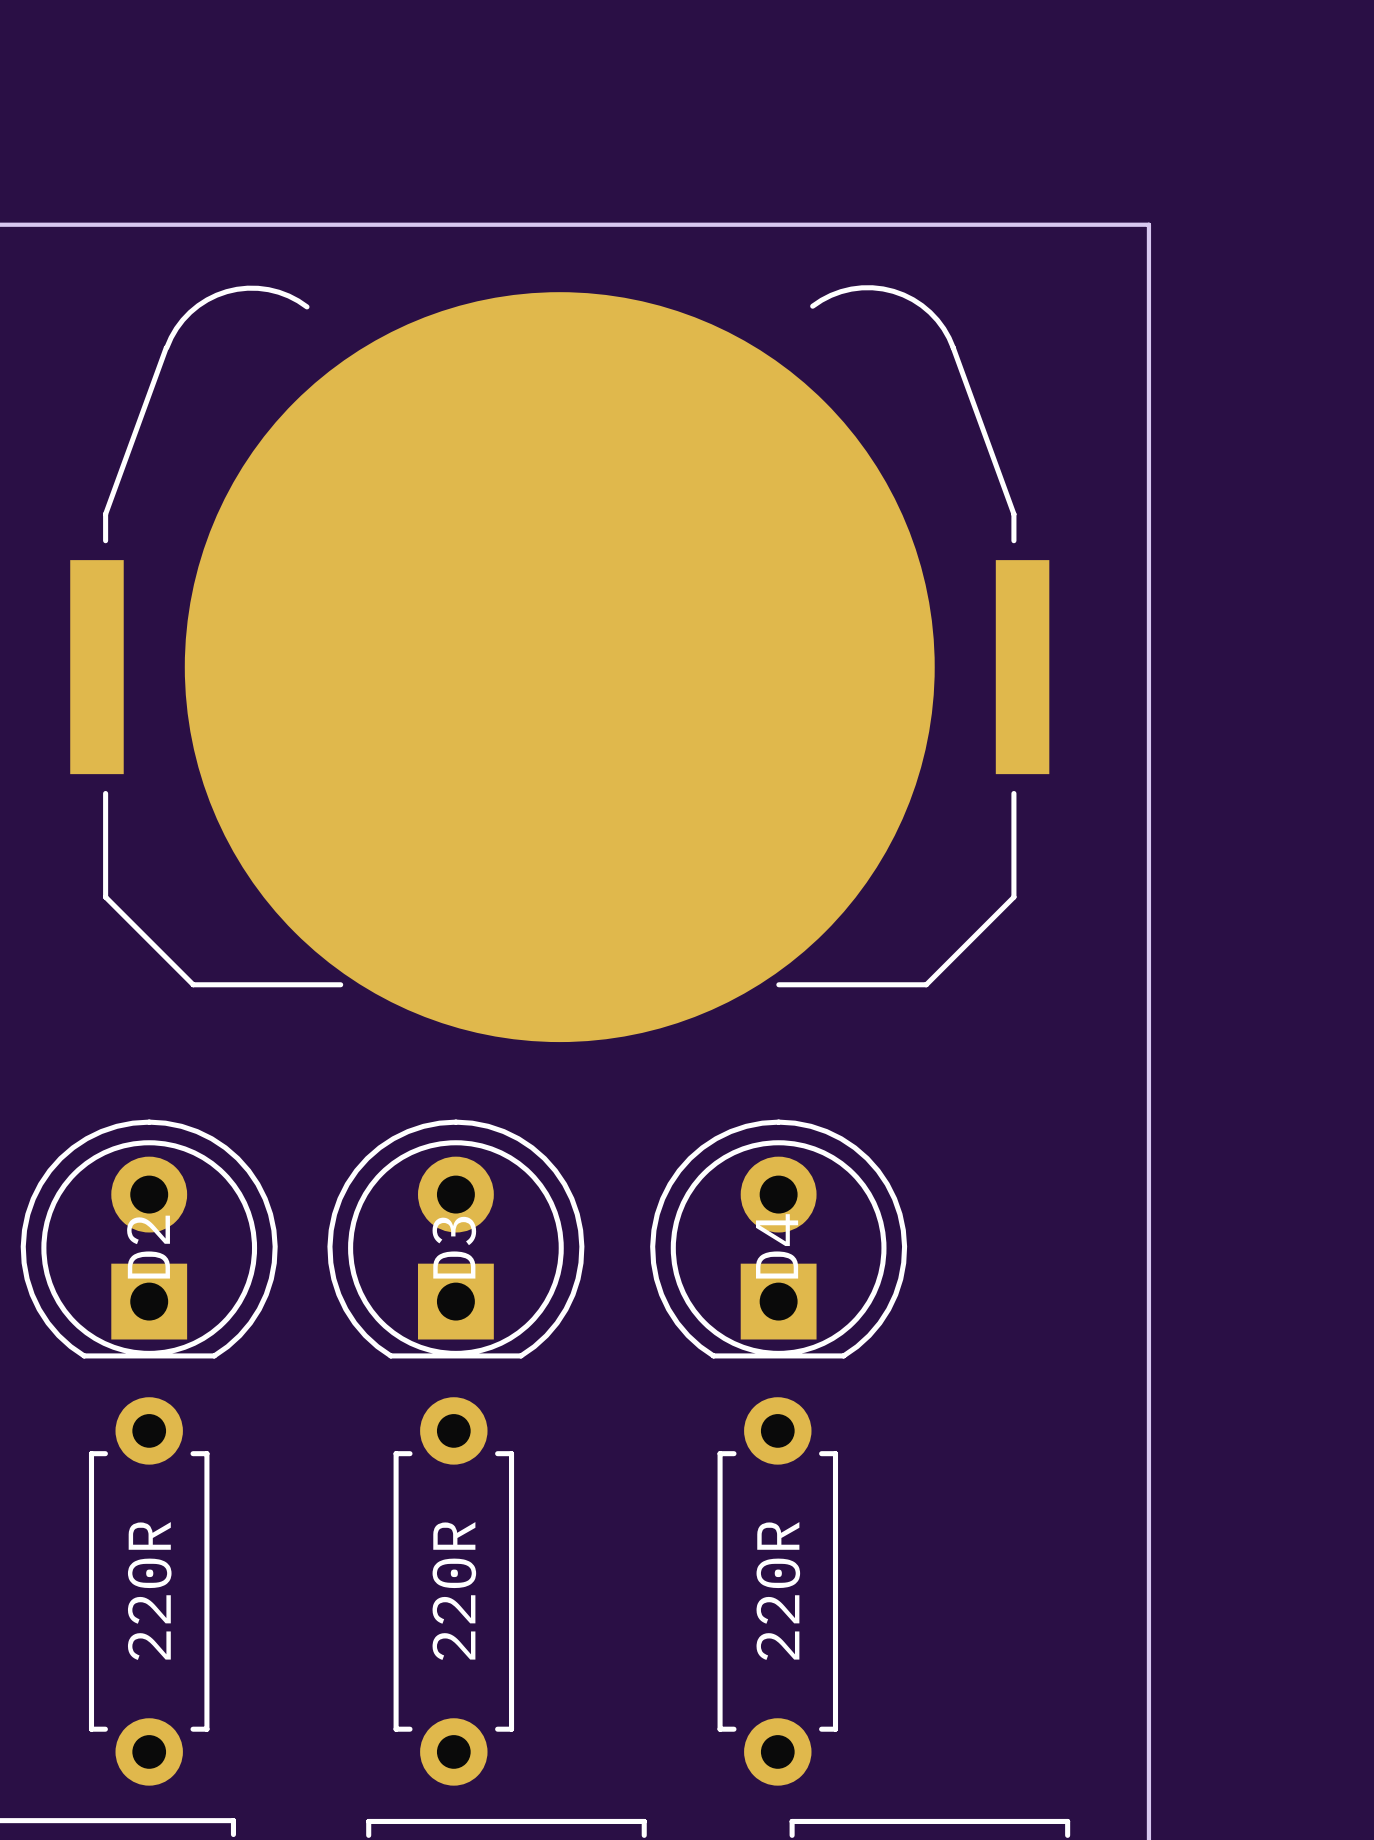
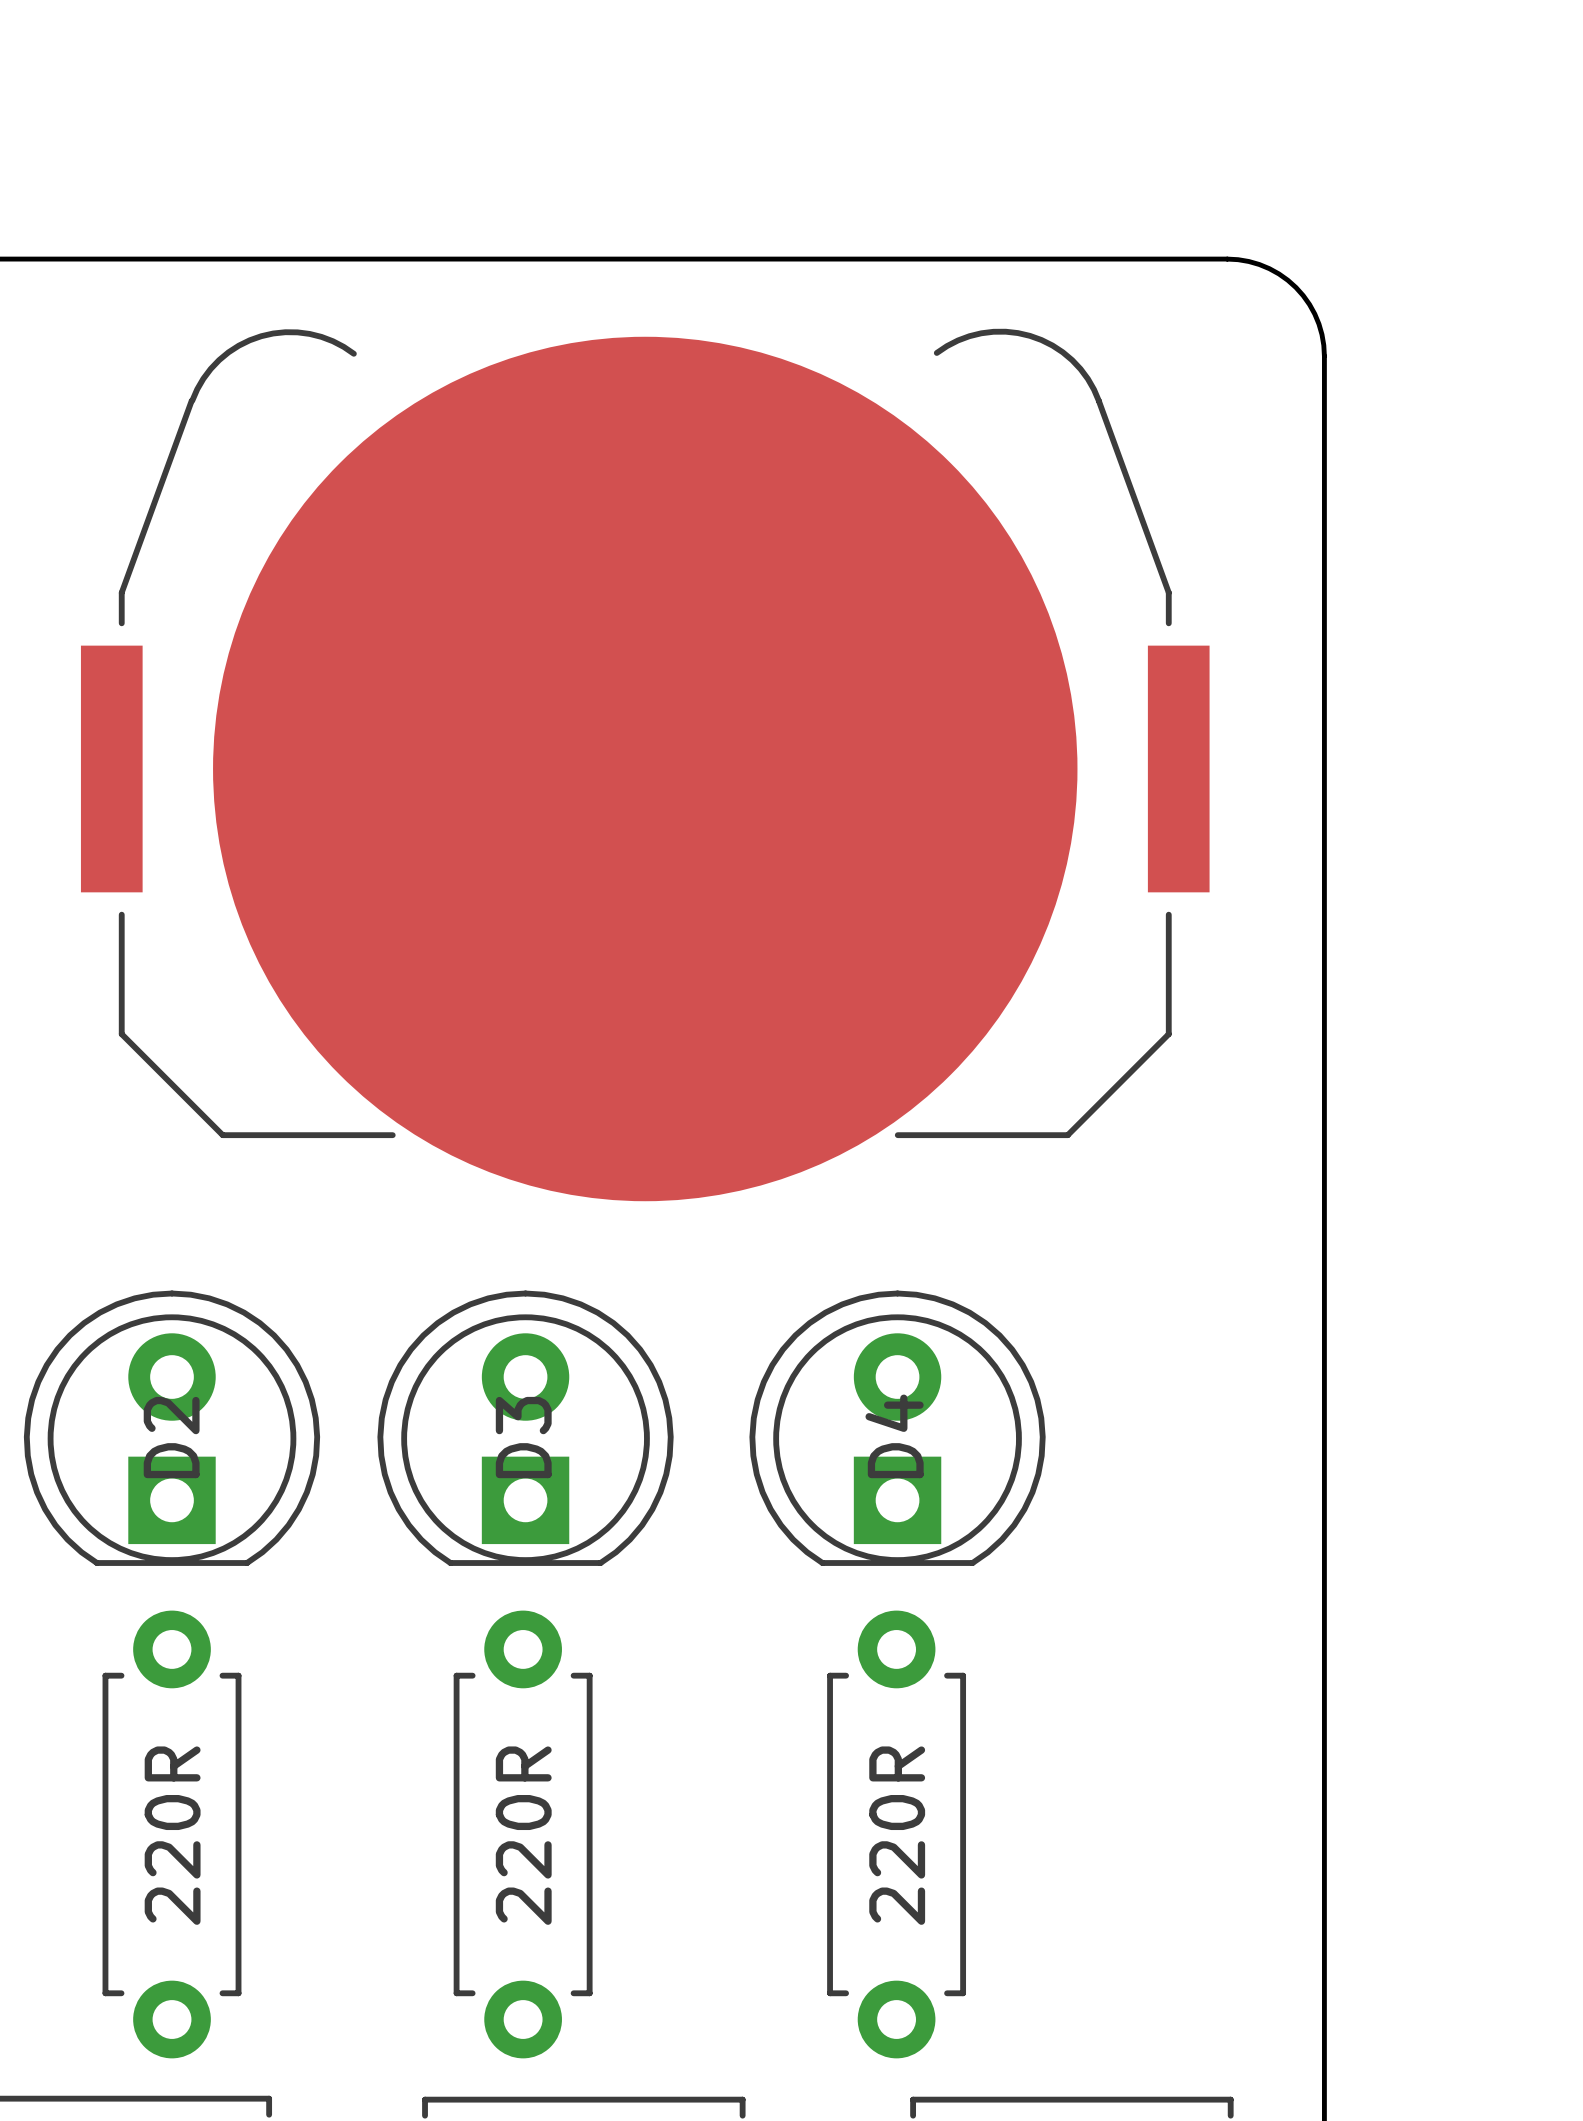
board edge: (1064, 224) (1148, 224) (1148, 309) -> (1227, 259) (1259, 264) (1278, 273) (1295, 287) (1309, 304) (1318, 324) (1324, 356)

